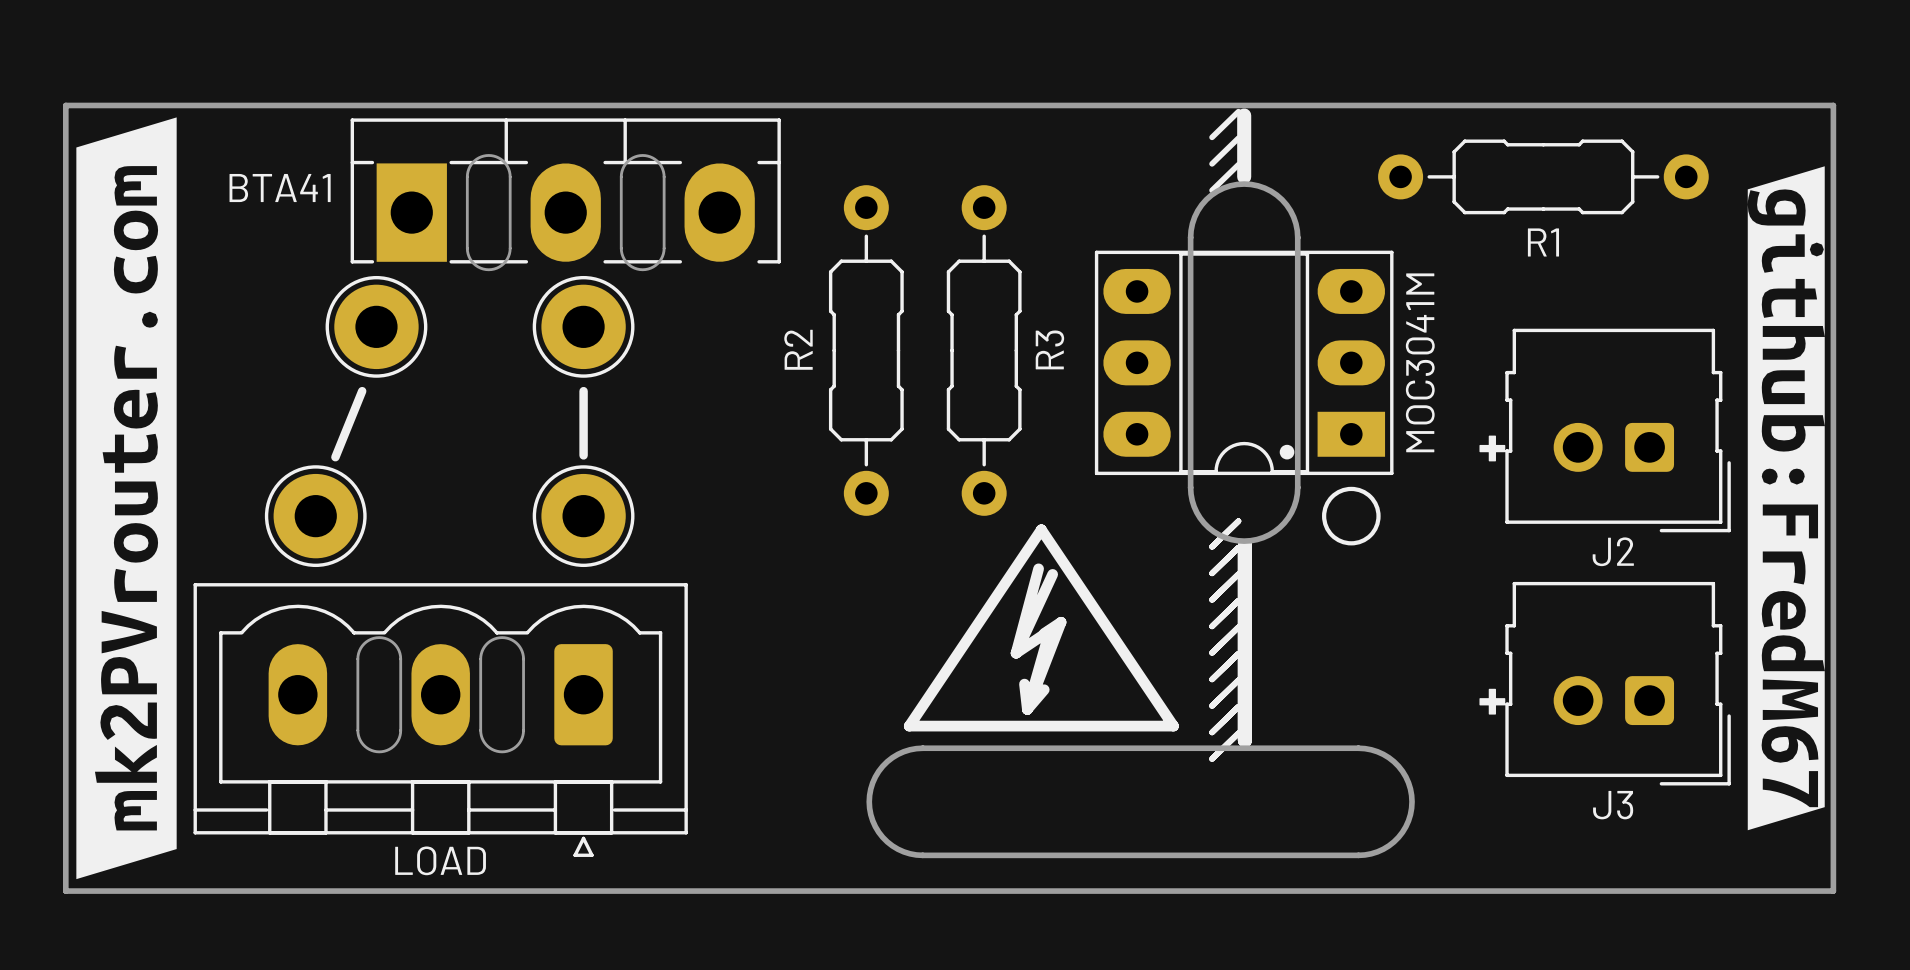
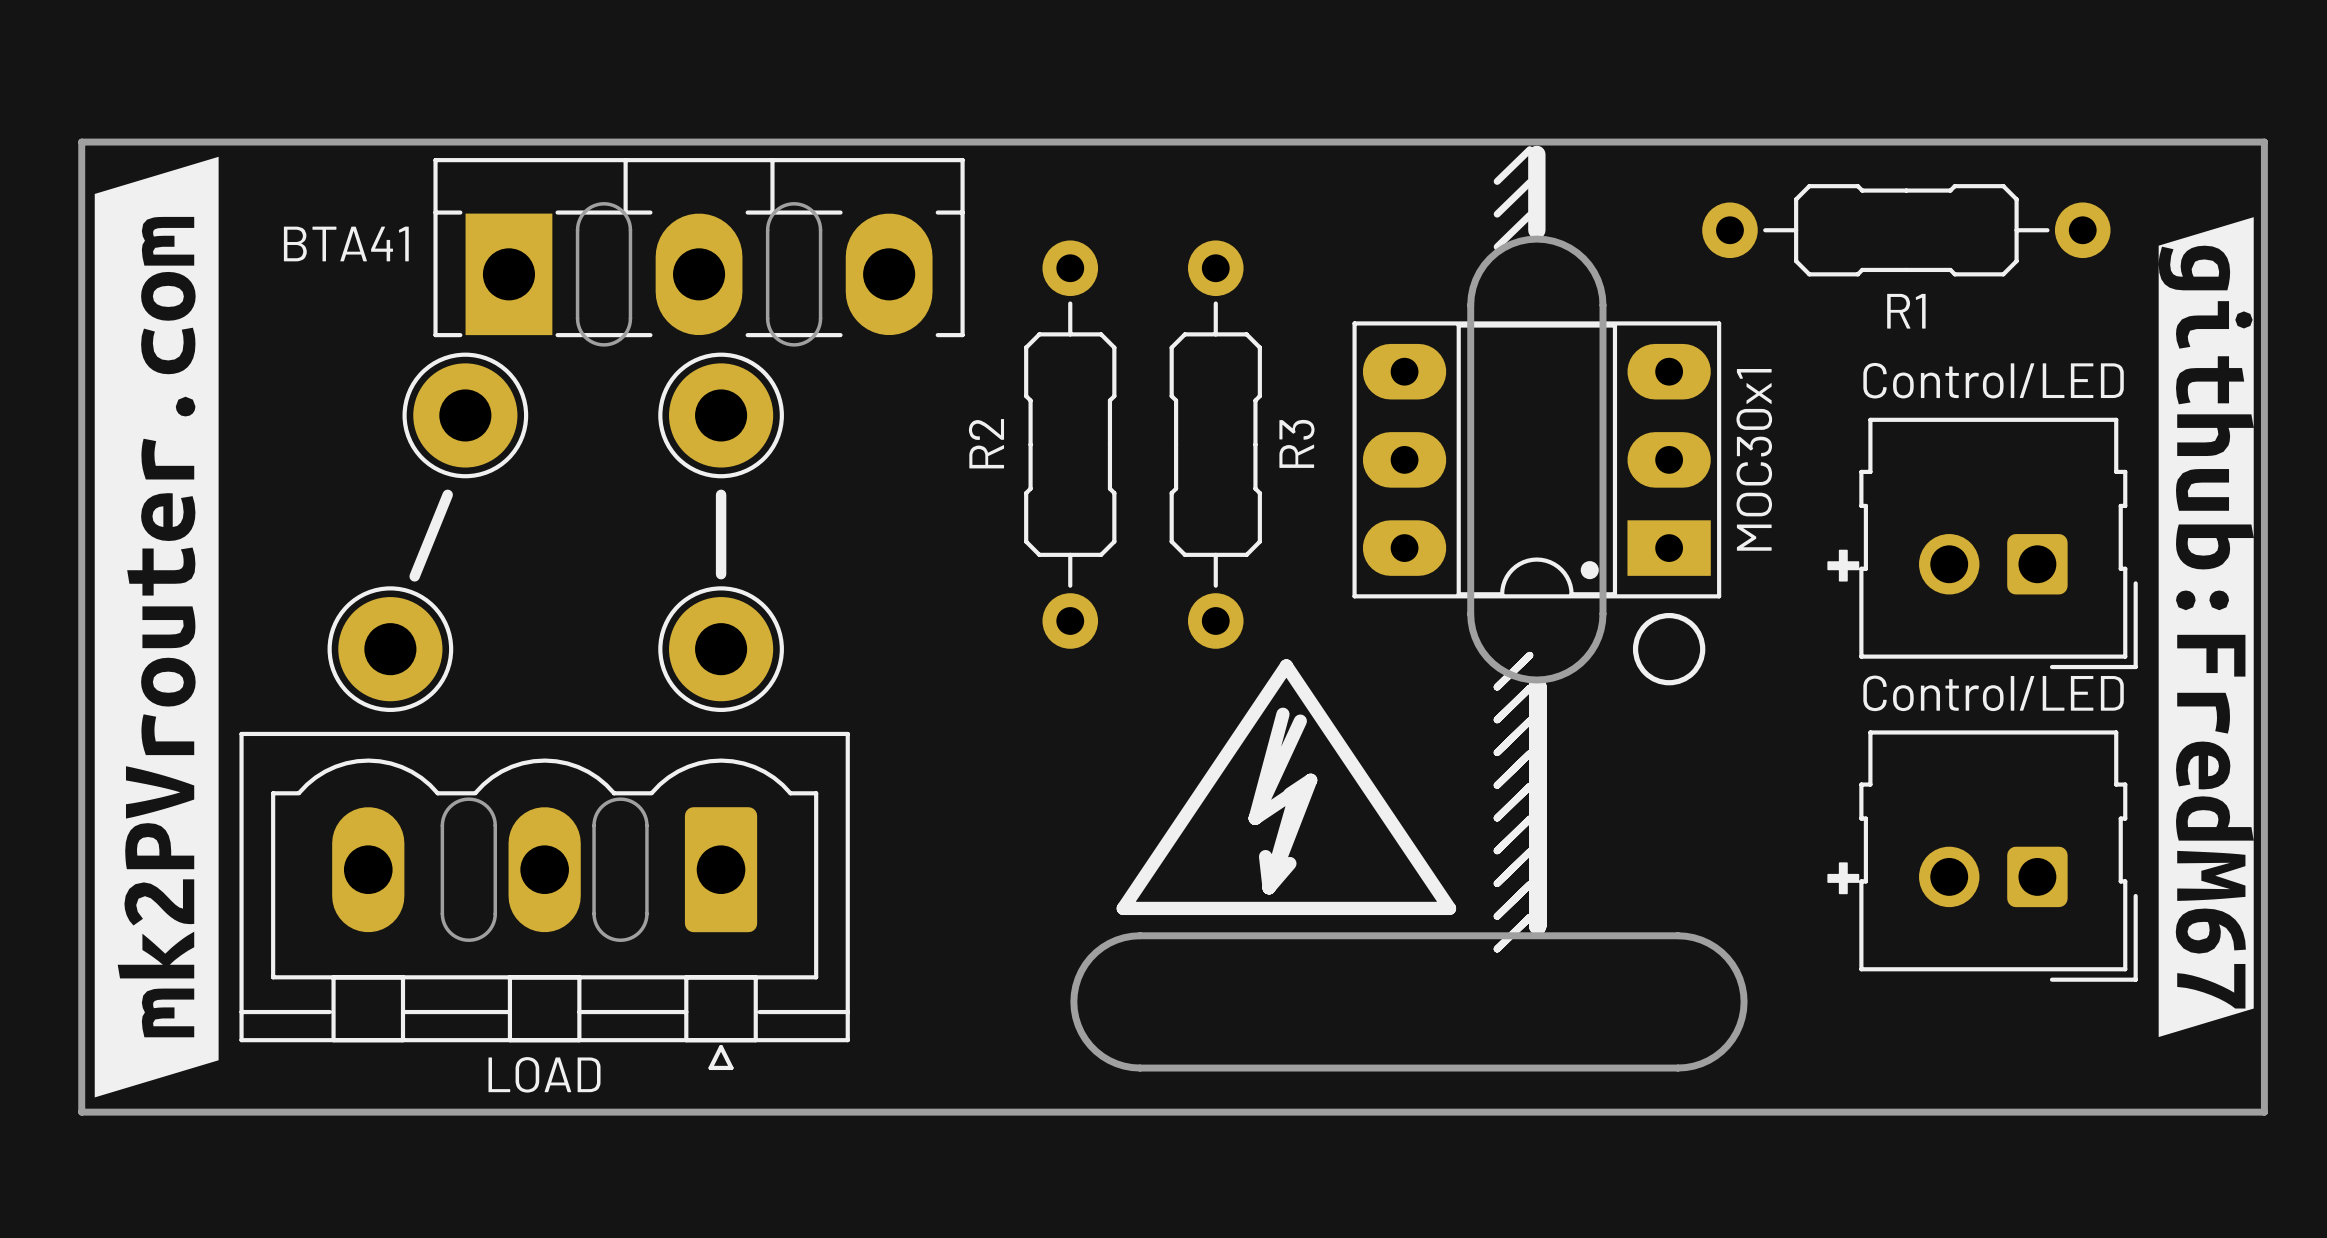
J2 value: none -> Control/LED (1993, 380)
part value: MOC3041M (1420, 362) -> MOC30x1 (1754, 459)
J2 name: J2 (1613, 551) -> none
J3 value: none -> Control/LED (1993, 693)
J3 name: J3 (1613, 805) -> none

